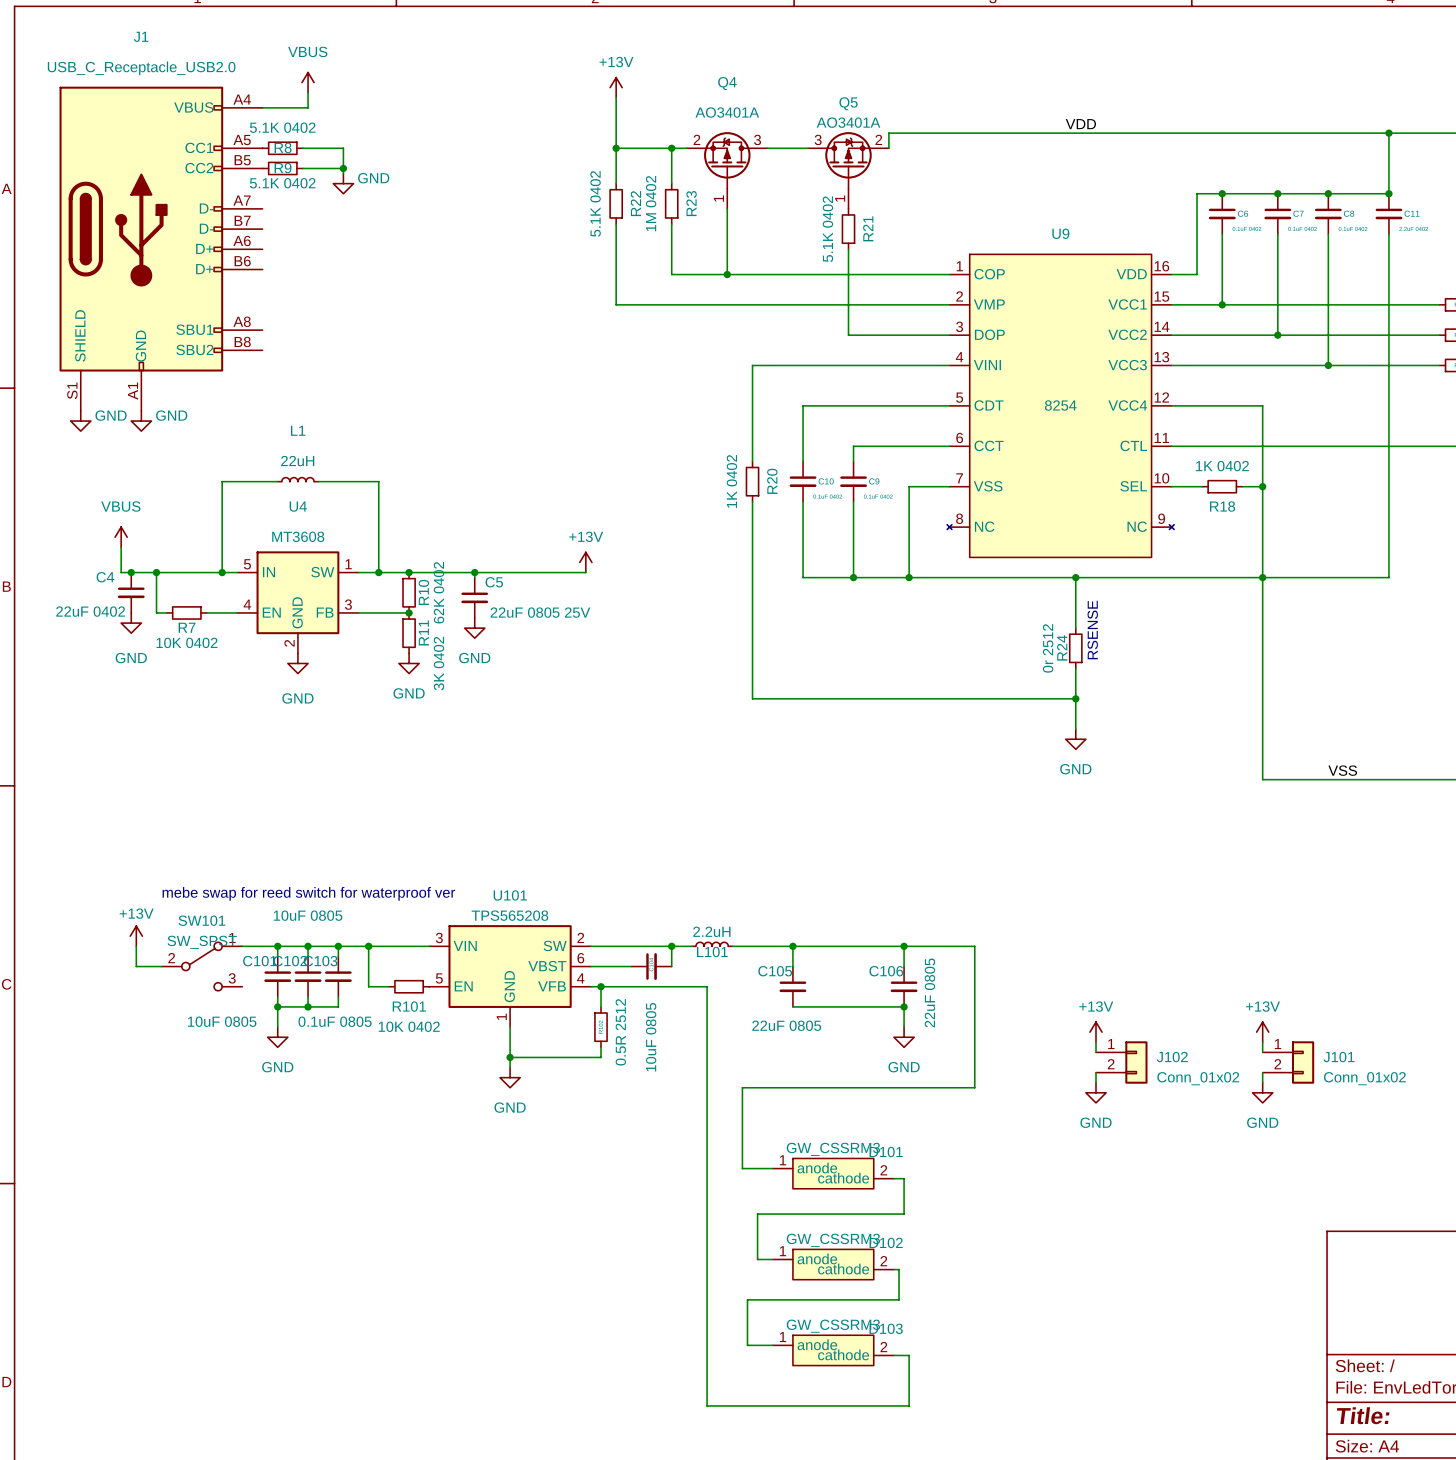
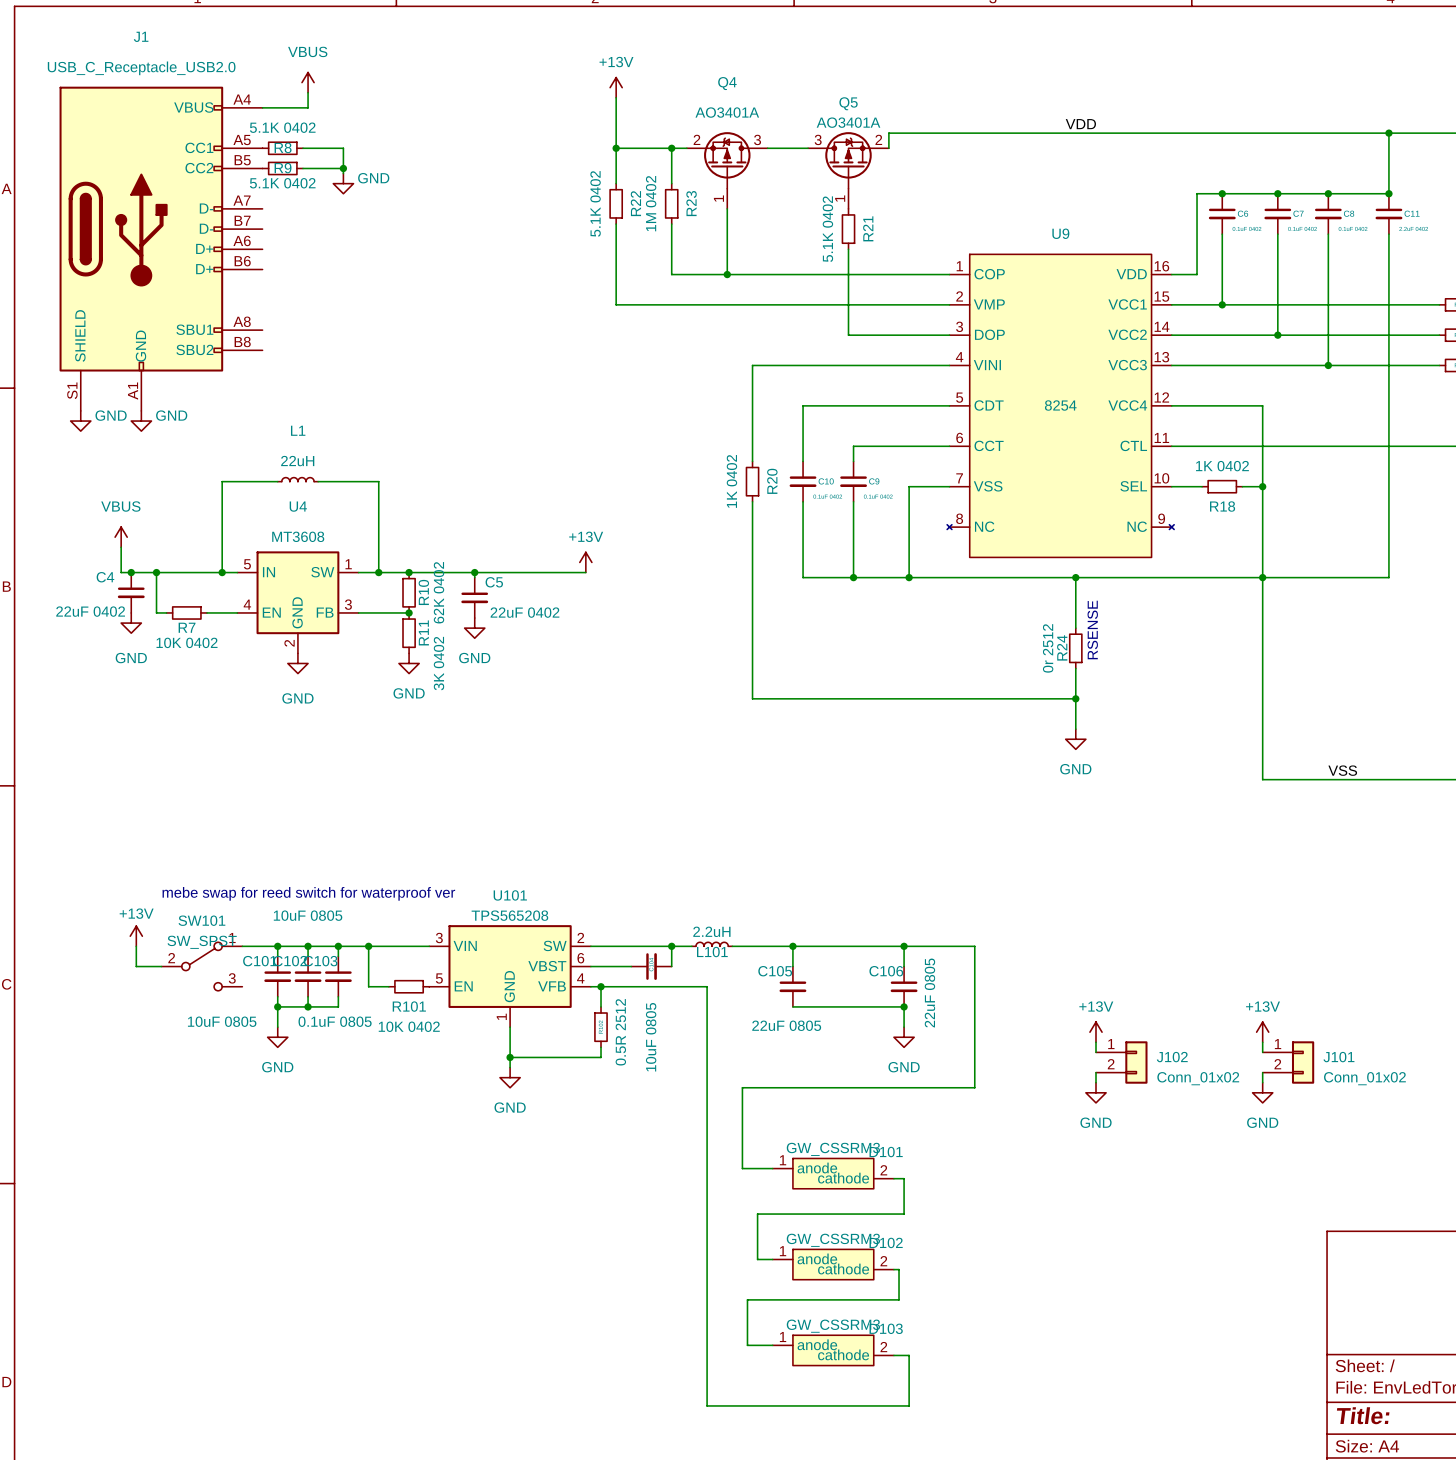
C5 value: 22uF 0805 25V (540, 612) -> 22uF 0402 (524, 612)

